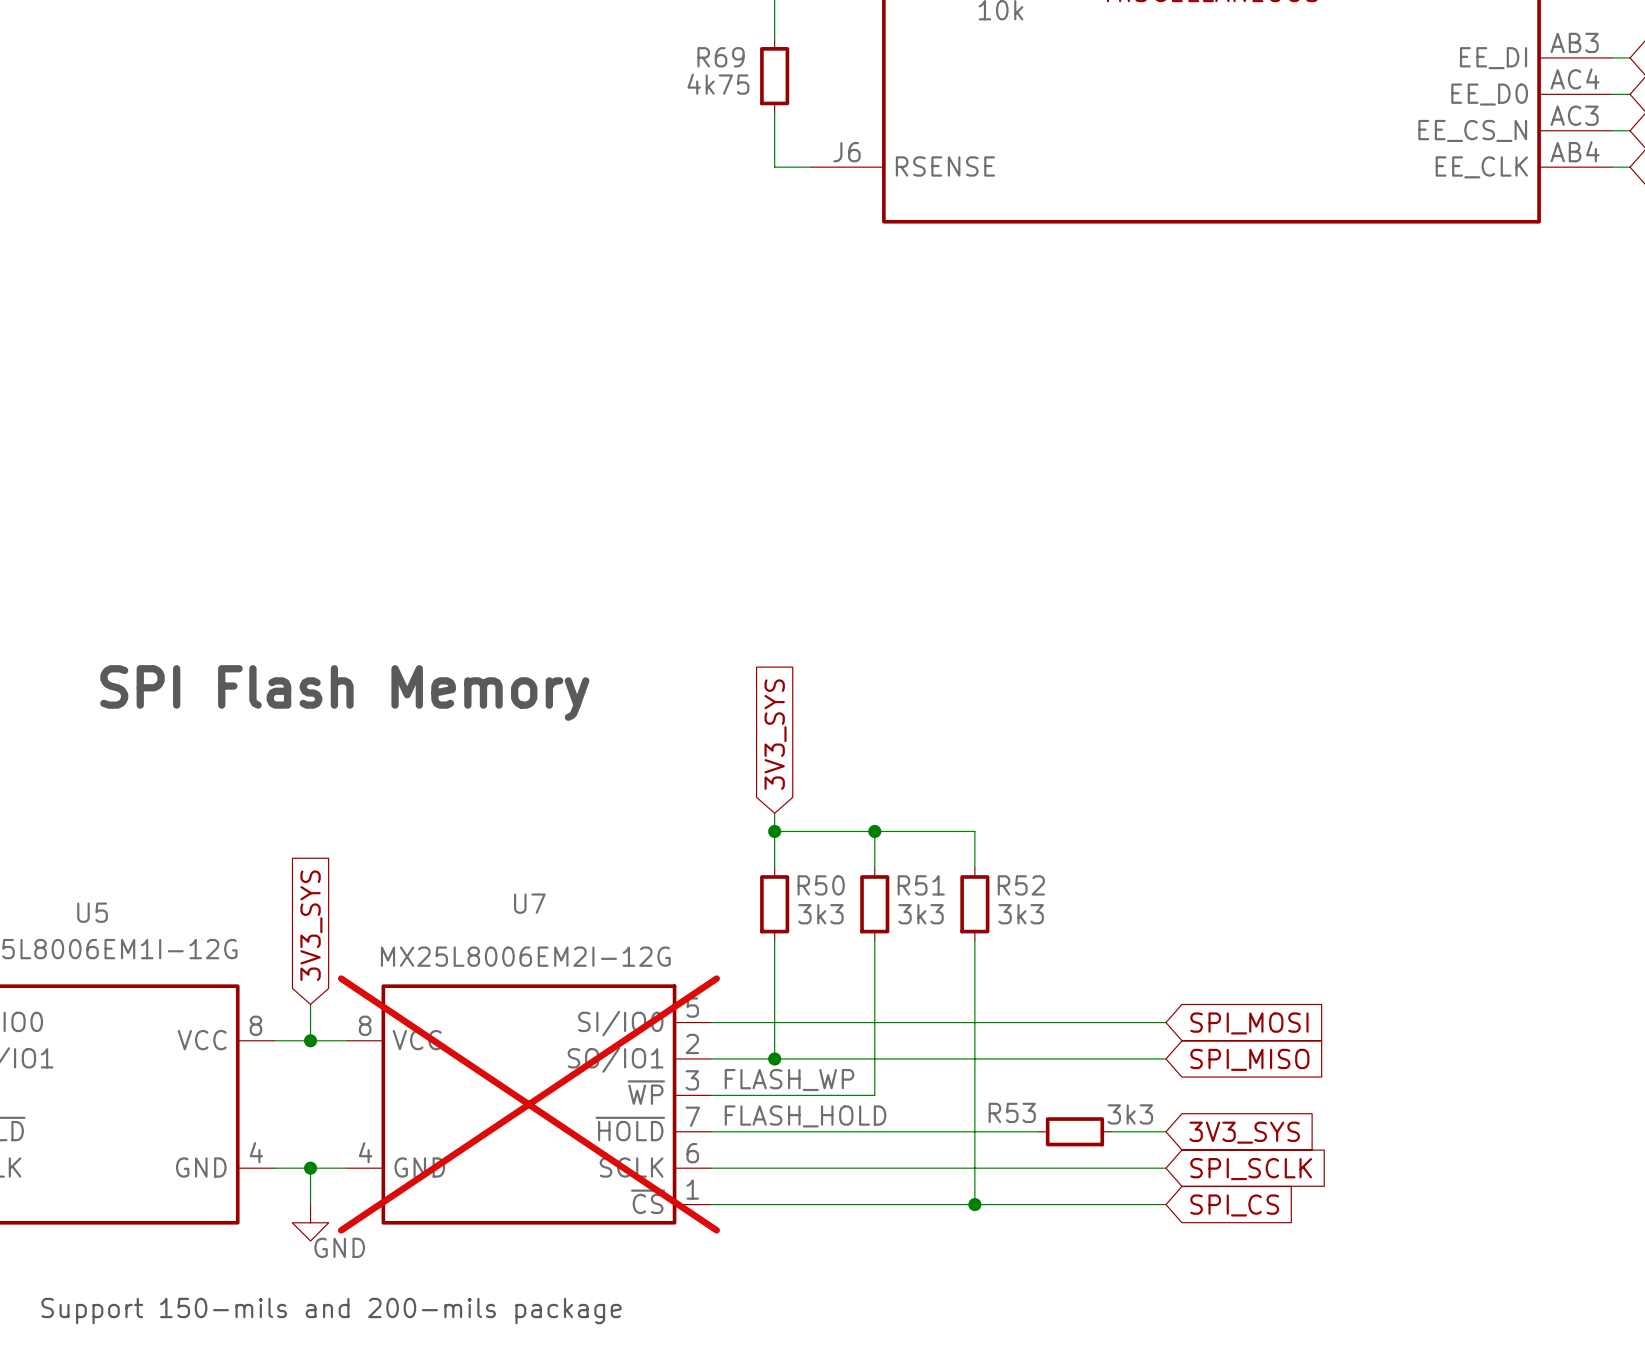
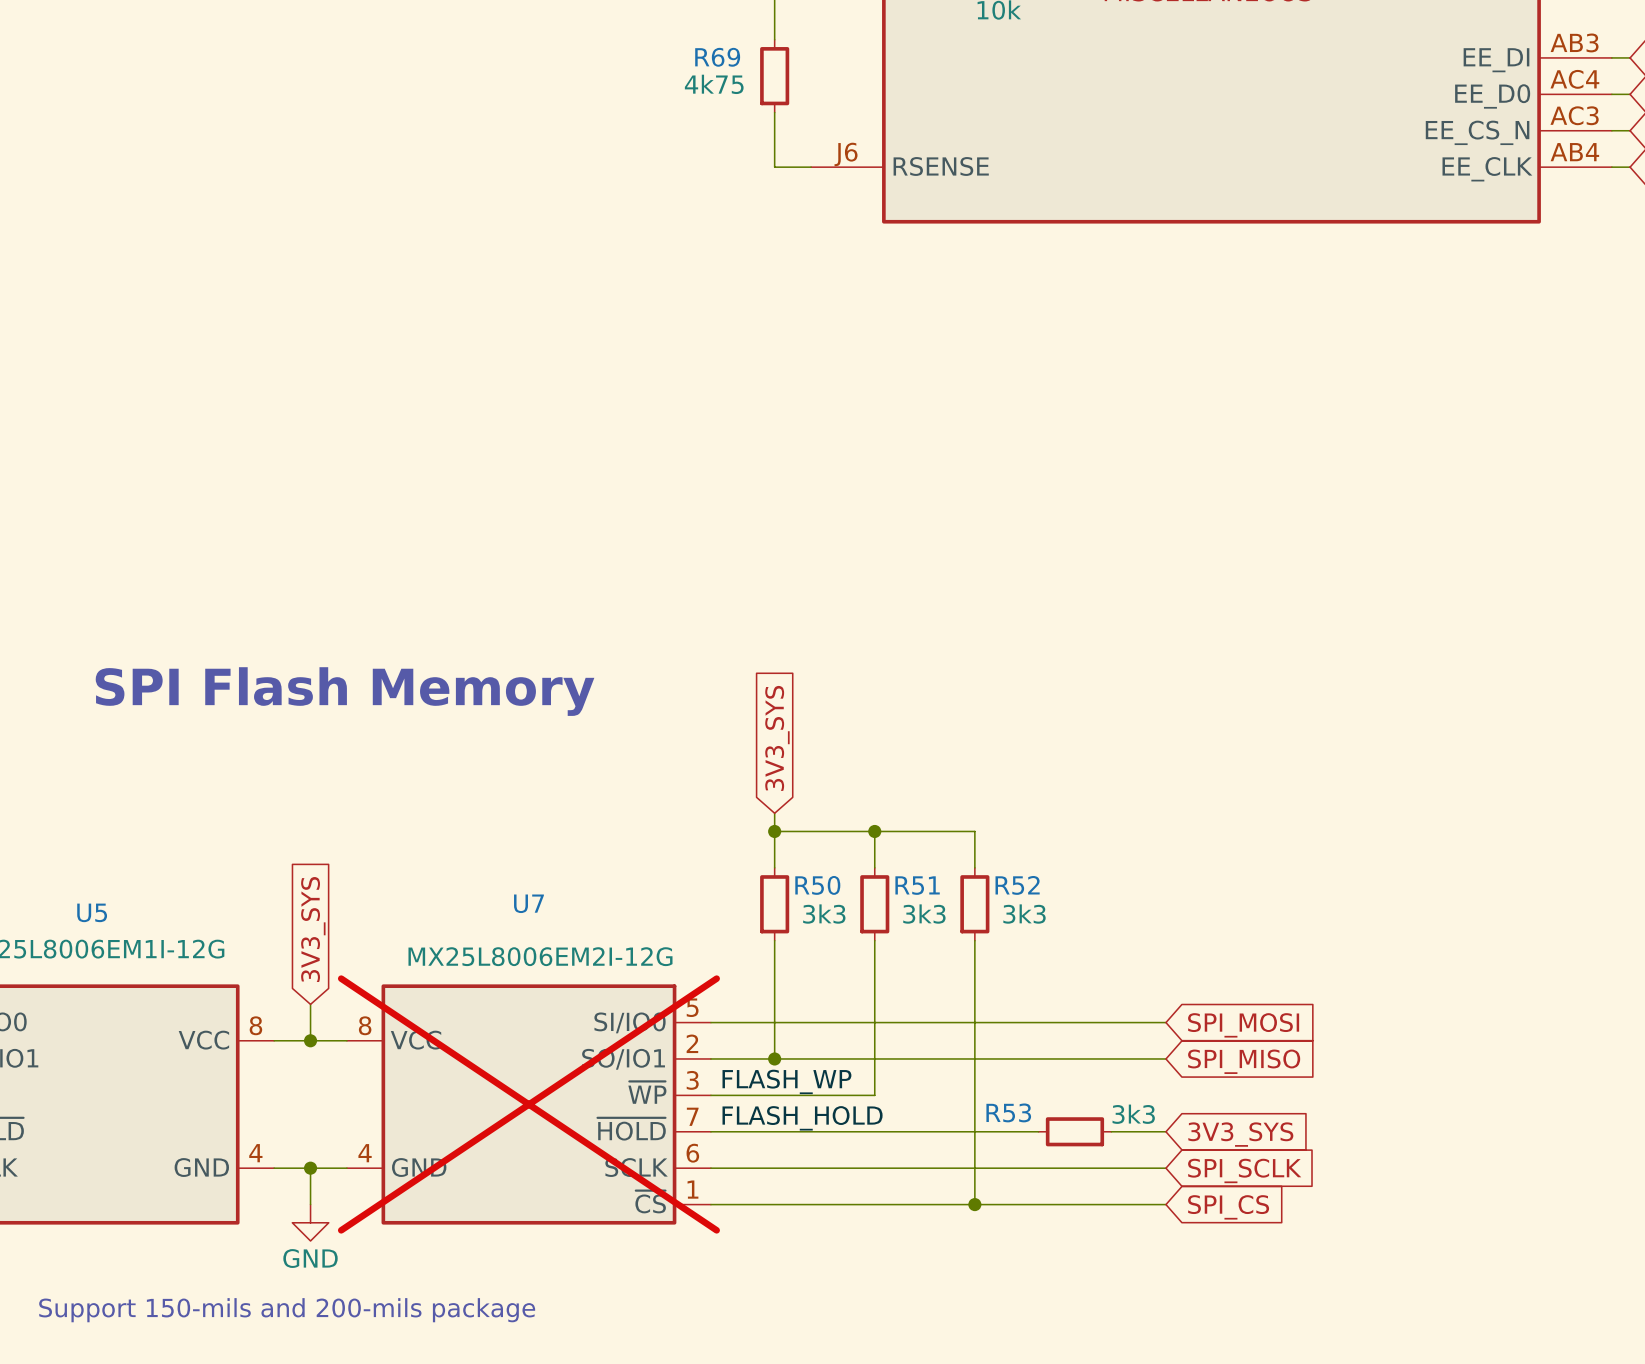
power symbol text position: GND (339, 1247) -> GND (310, 1258)

